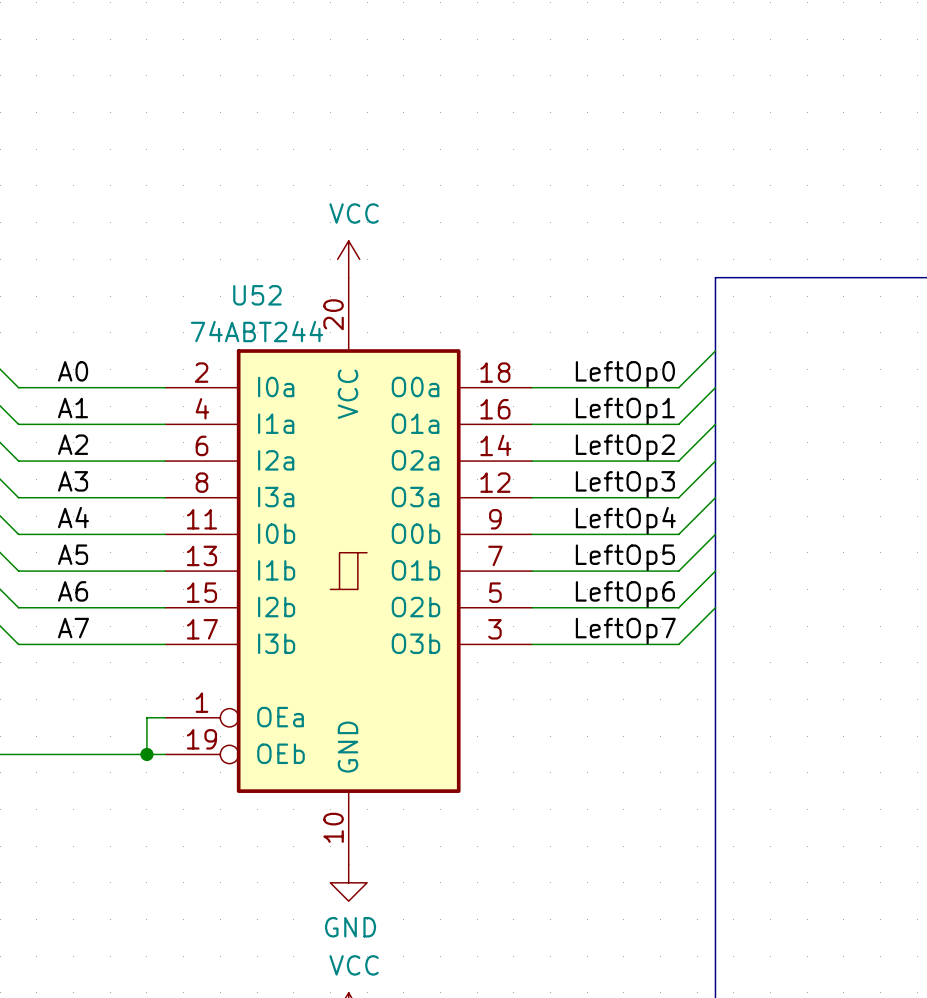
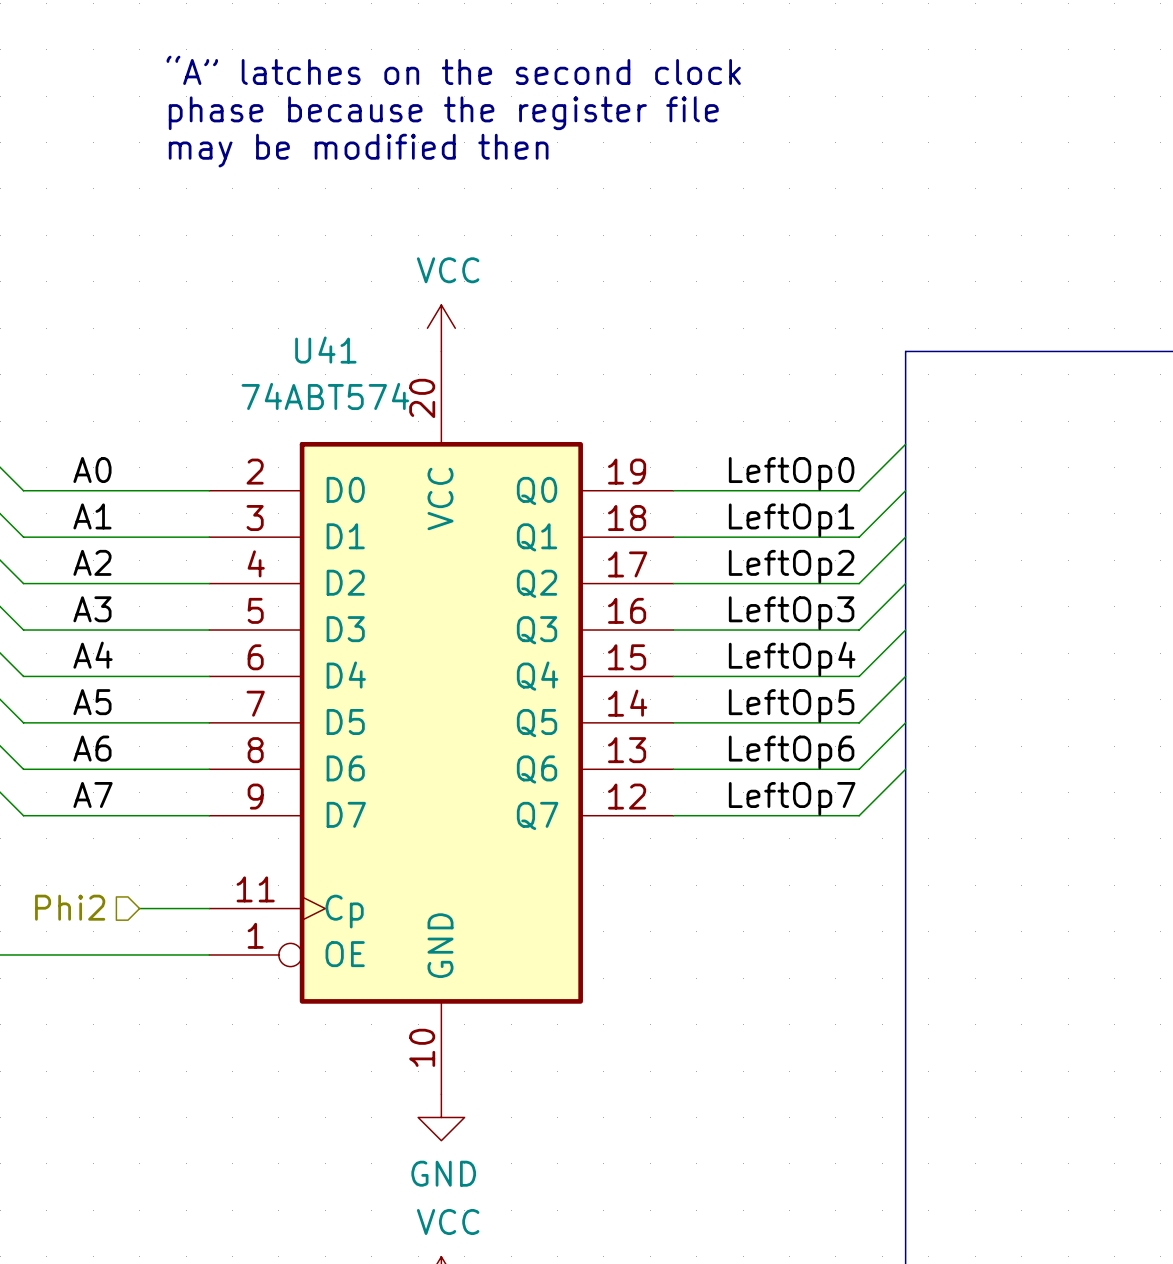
text: none -> “A” latches on the second clock (453, 70)
text: none -> phase because the register file (443, 113)
text: none -> may be modified then (358, 150)
U52: 74ABT244 (348, 571) -> none
U41: none -> 74ABT574 (441, 722)
hierarchical label: none -> Phi2 (70, 907)
wire: (146, 717) (146, 754) -> (186, 908) (139, 908)
junction: (146, 754) -> none

